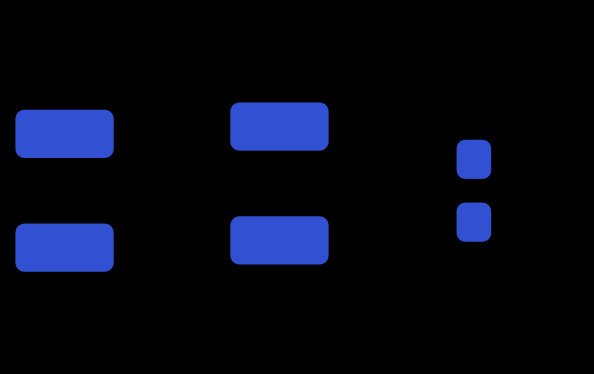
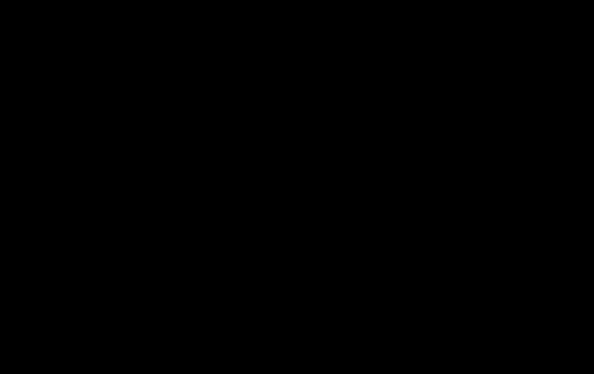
part: (279, 183) -> none
part: (64, 190) -> none
part: (473, 190) -> none

